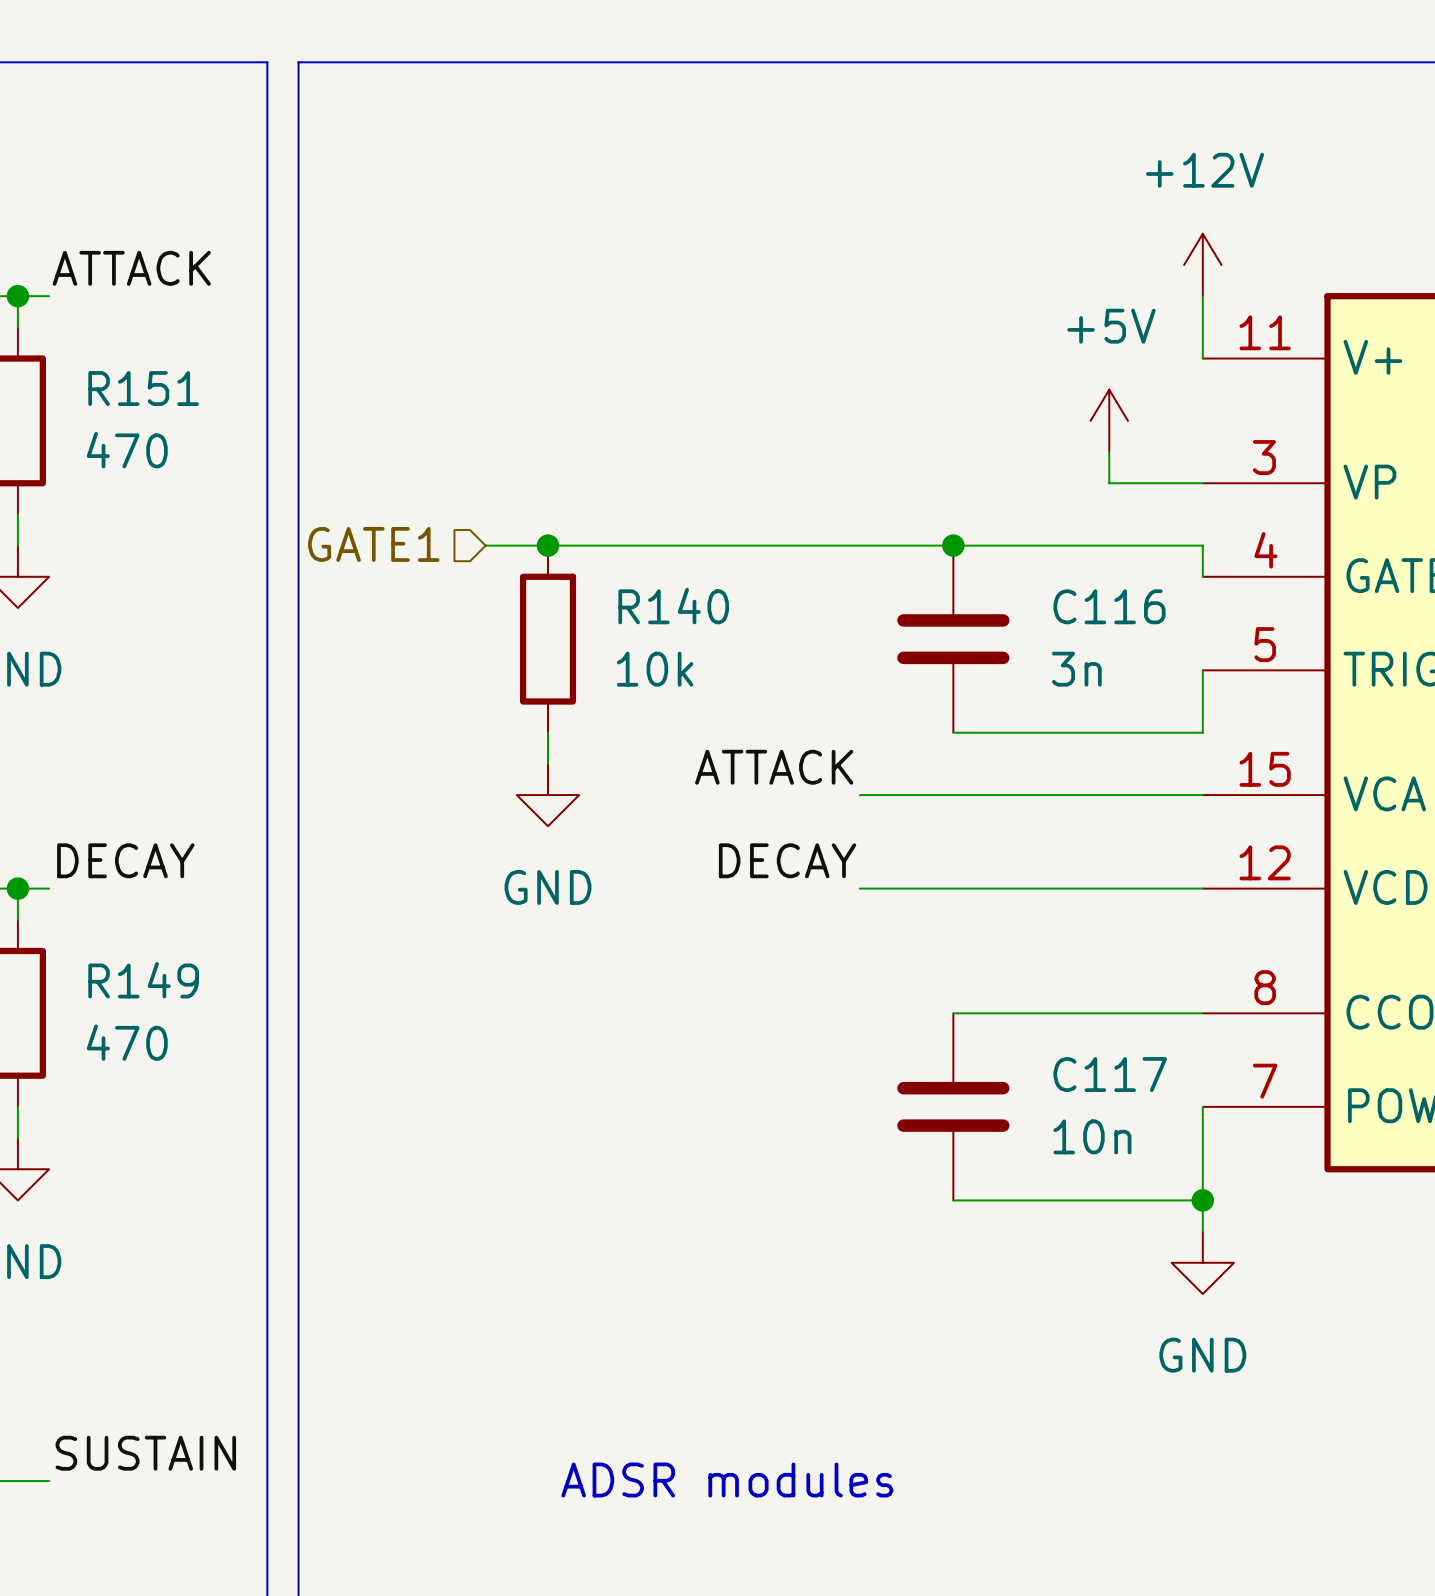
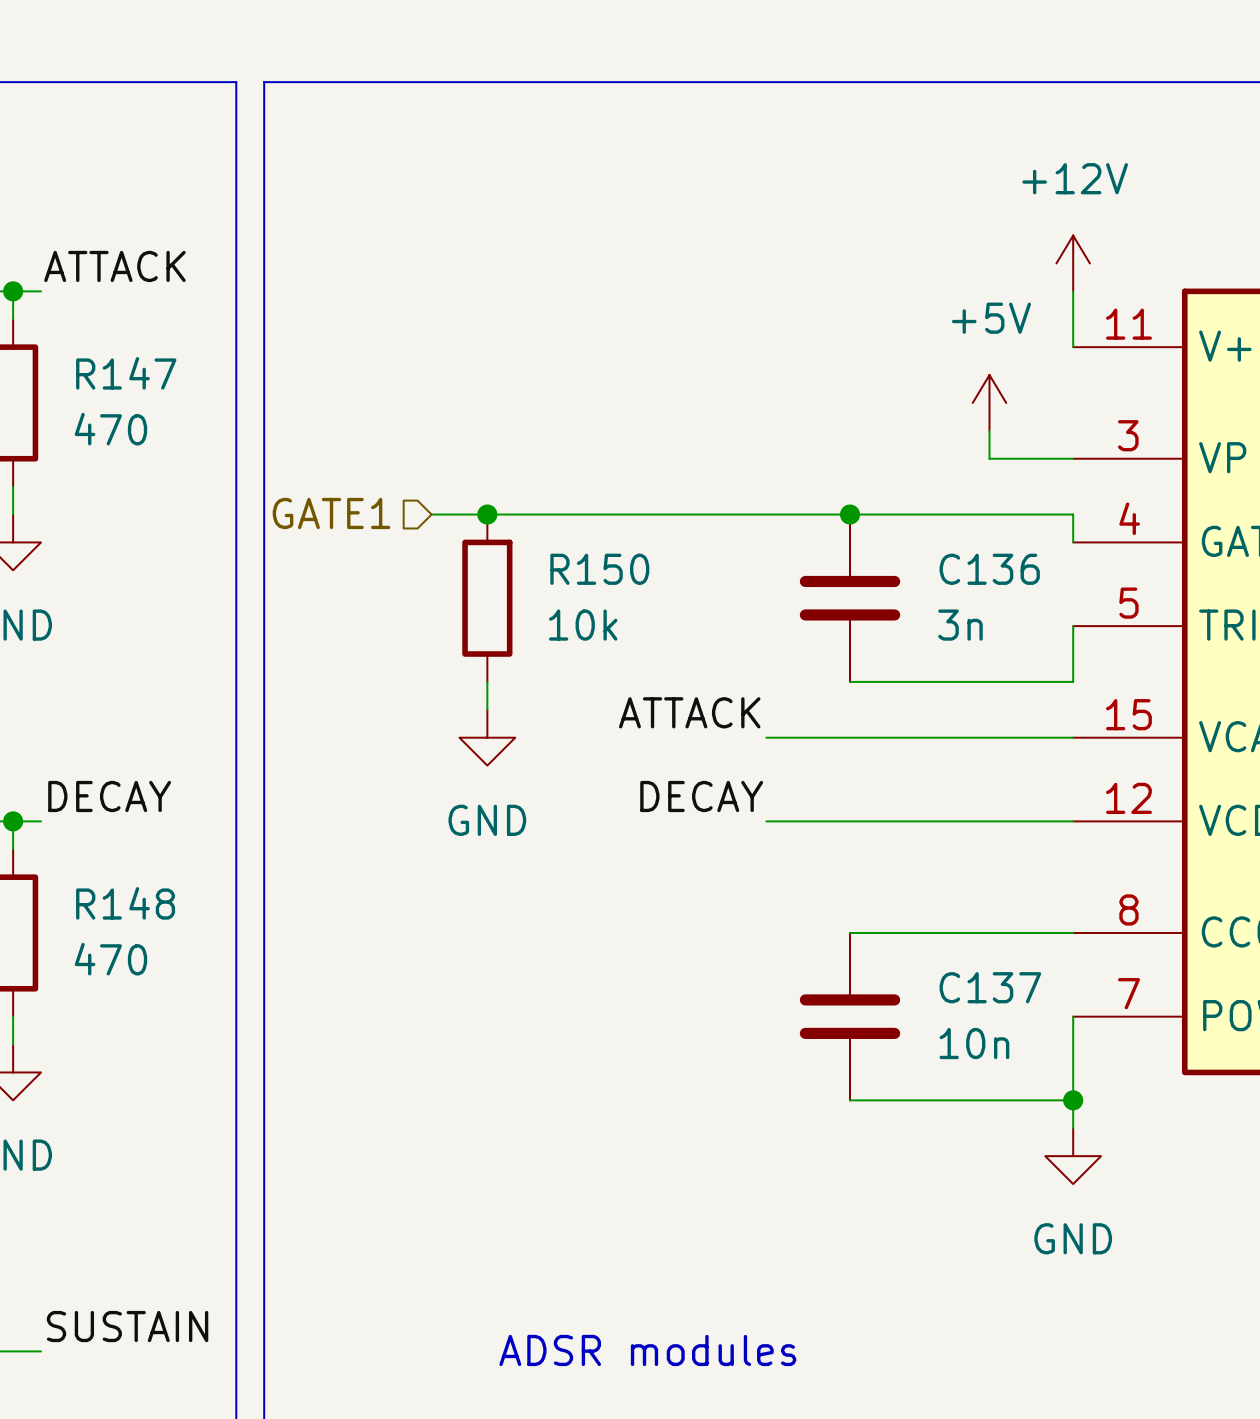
R151 name: R151 (143, 388) -> R147 (126, 373)
R140 name: R140 (673, 606) -> R150 (599, 569)
C116 name: C116 (1109, 606) -> C136 (989, 569)
R149 name: R149 (143, 980) -> R148 (125, 903)
C117 name: C117 (1110, 1074) -> C137 (990, 987)

